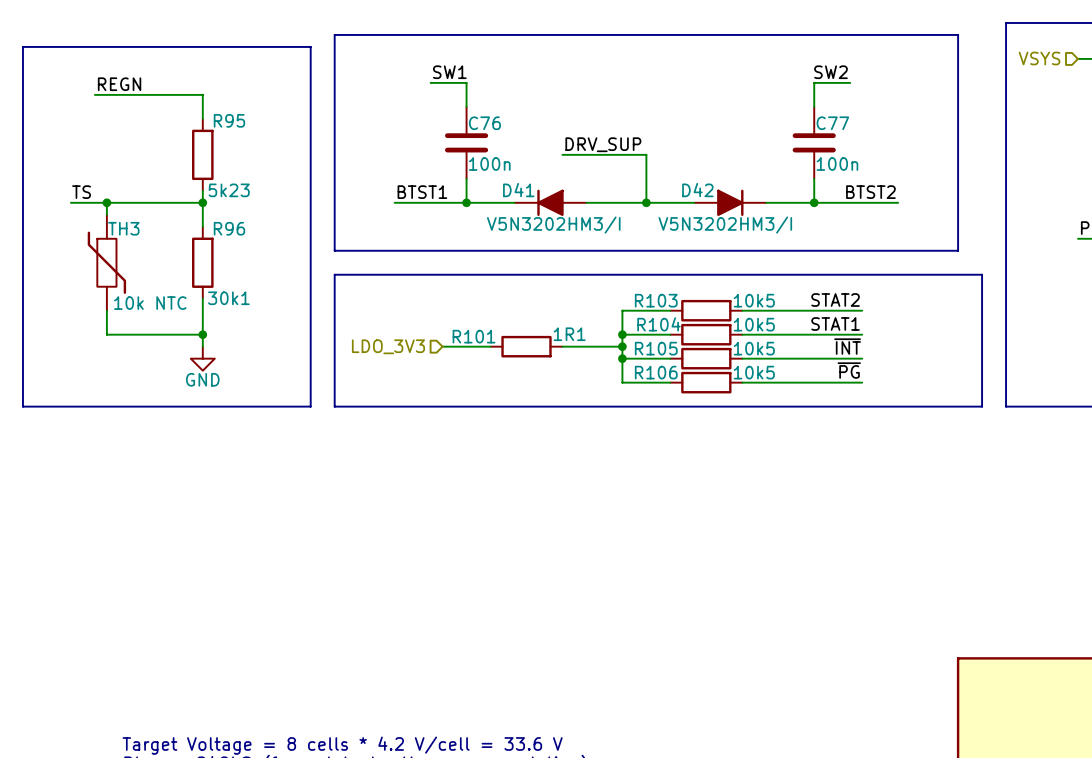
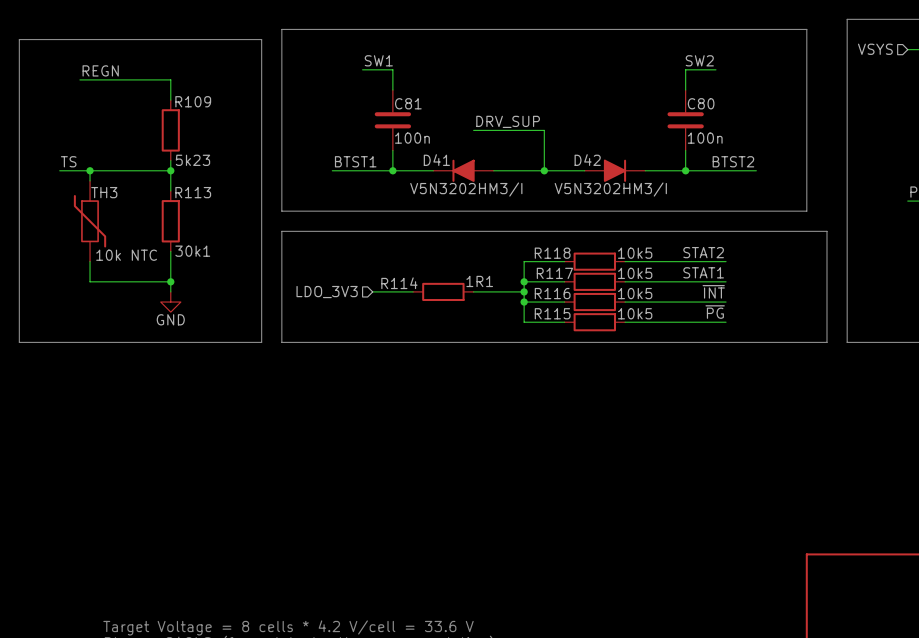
R95 name: R95 (229, 120) -> R109 (193, 101)
C76 name: C76 (484, 123) -> C81 (408, 103)
C77 name: C77 (832, 123) -> C80 (701, 103)
R96 name: R96 (229, 228) -> R113 (193, 192)
R103 name: R103 (656, 300) -> R118 (552, 253)
R104 name: R104 (658, 324) -> R117 (554, 273)
R101 name: R101 (474, 336) -> R114 (399, 283)
R105 name: R105 (656, 348) -> R116 (552, 293)
R106 name: R106 (656, 372) -> R115 (552, 313)

